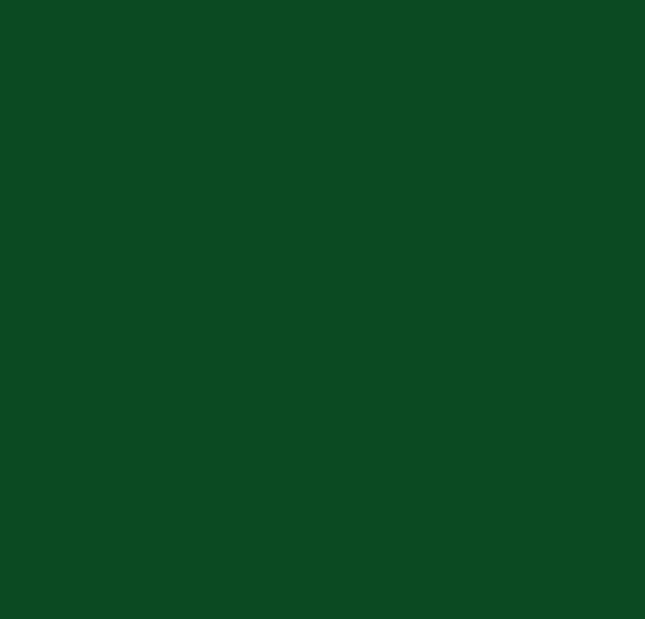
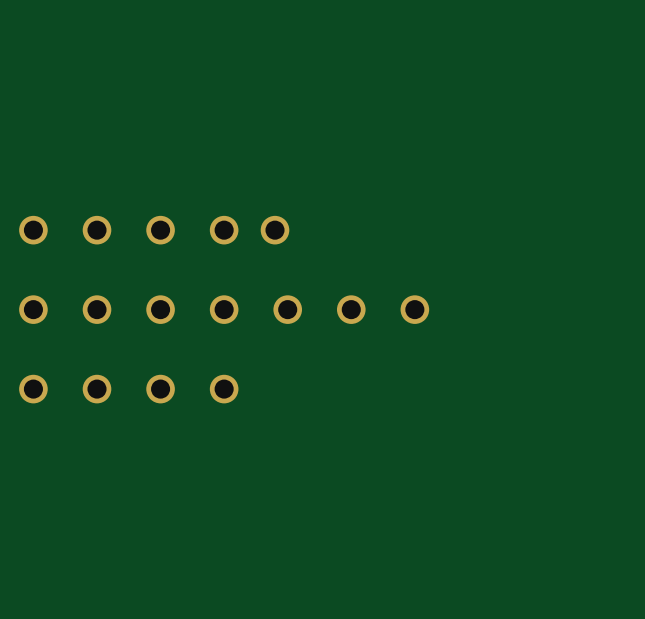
via: none -> (33, 230)
via: none -> (97, 230)
via: none -> (160, 230)
via: none -> (224, 230)
via: none -> (275, 230)
via: none -> (33, 309)
via: none -> (97, 309)
via: none -> (160, 309)
via: none -> (224, 309)
via: none -> (287, 309)
via: none -> (351, 309)
via: none -> (414, 309)
via: none -> (33, 389)
via: none -> (97, 389)
via: none -> (160, 389)
via: none -> (224, 389)

